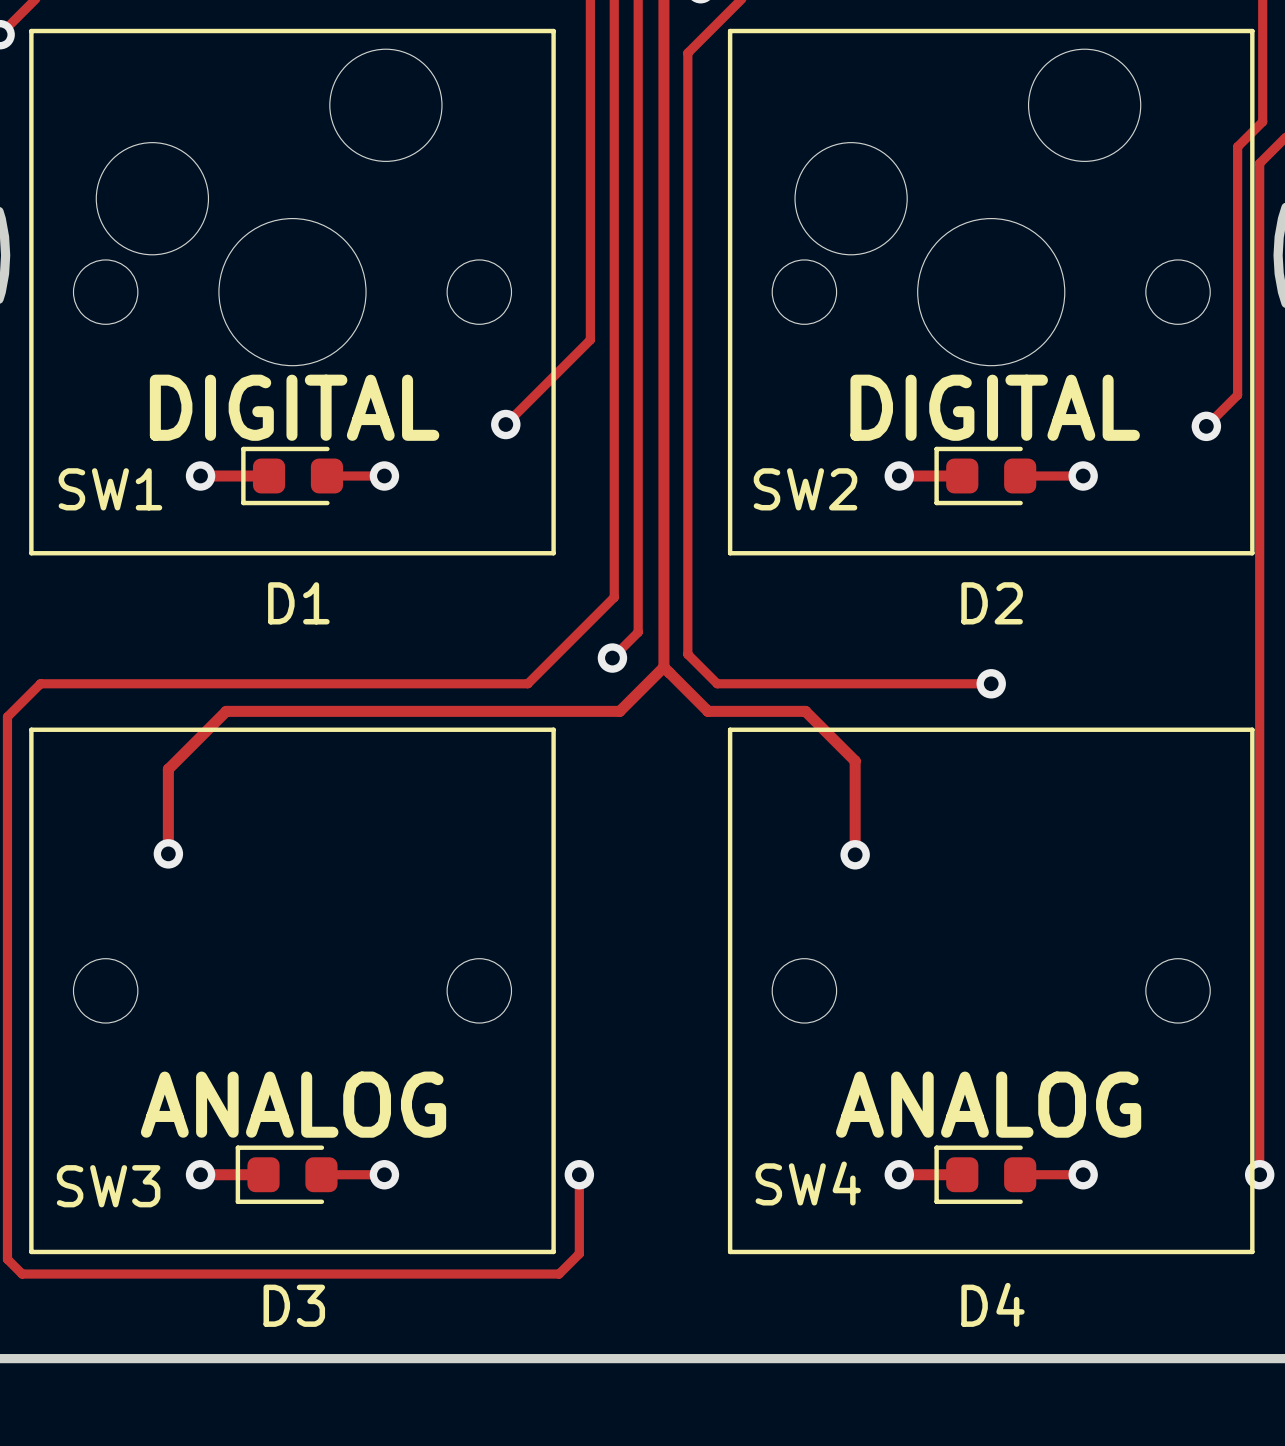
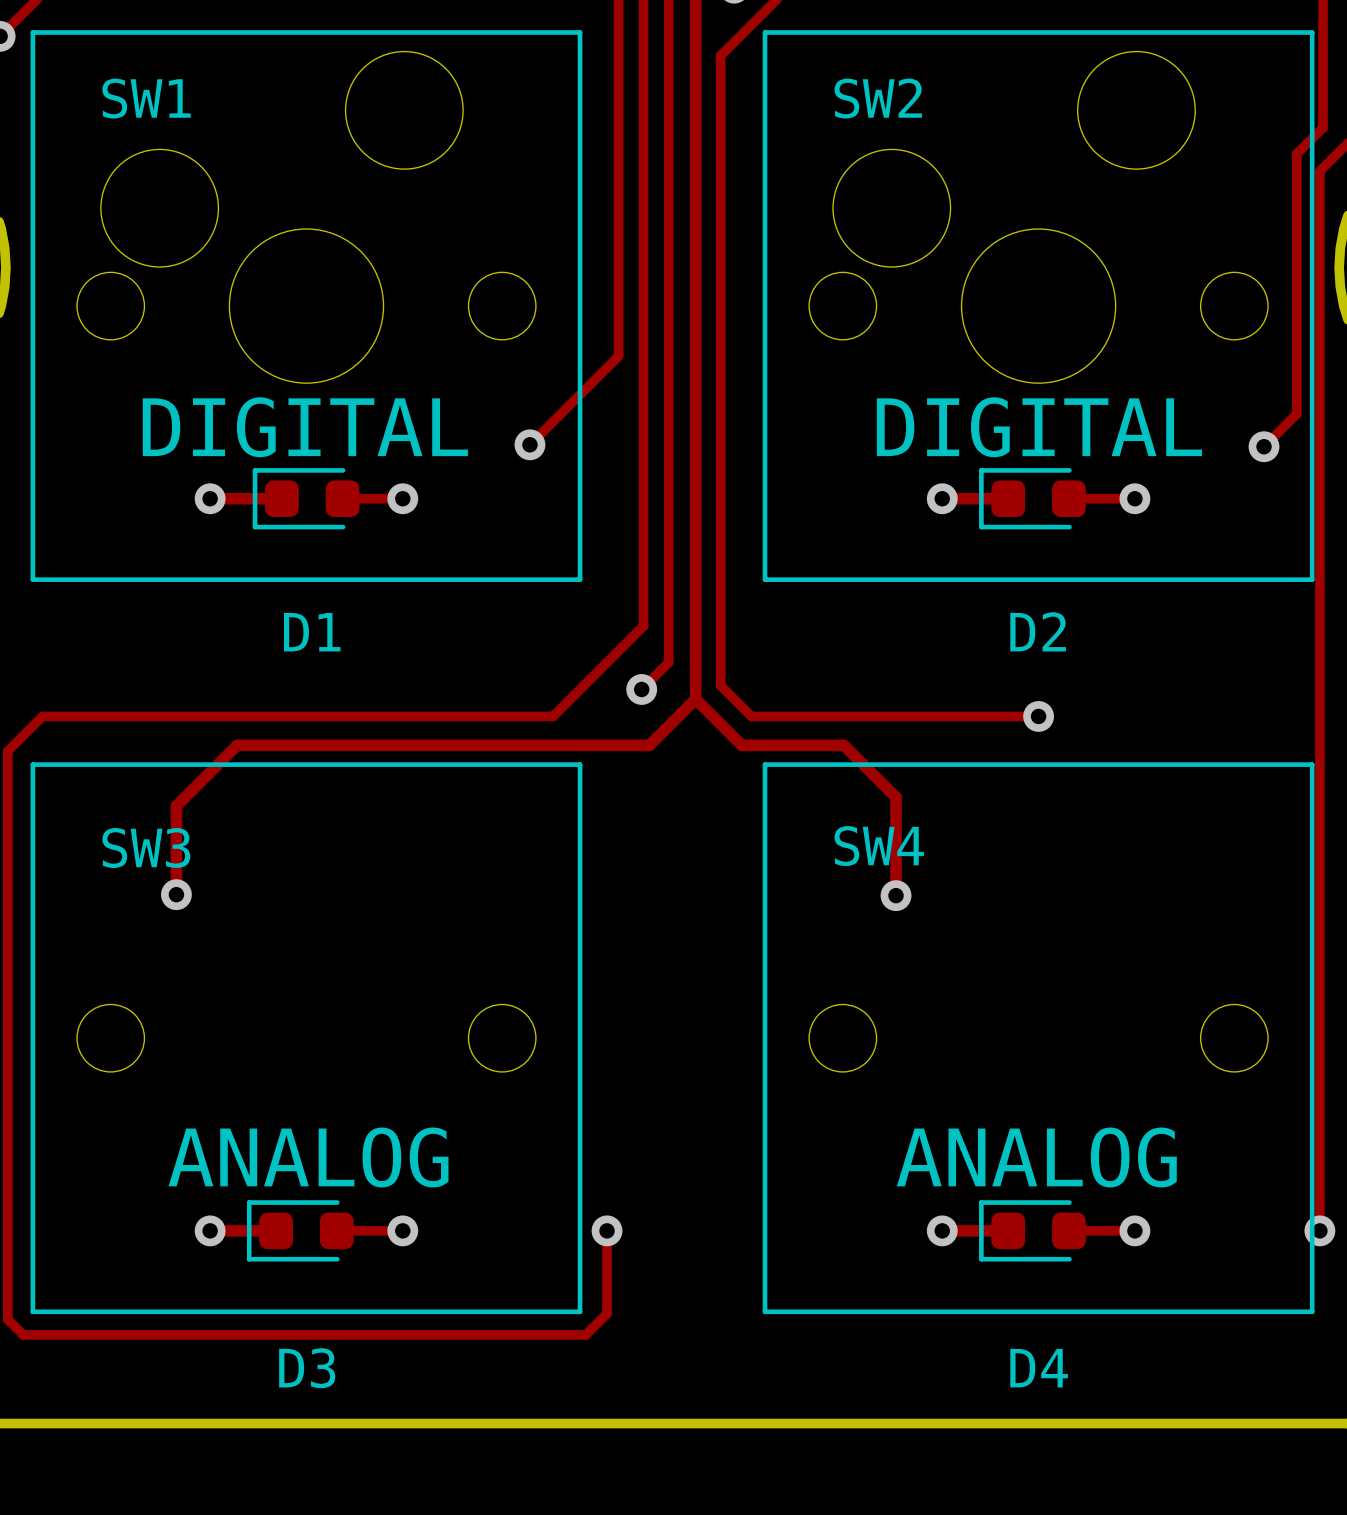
SW1 name position: SW1 (110, 489) -> SW1 (146, 98)
SW2 name position: SW2 (805, 489) -> SW2 (878, 98)
part text position: SW4 (808, 1183) -> SW4 (879, 846)
part text position: SW3 (108, 1186) -> SW3 (146, 847)

